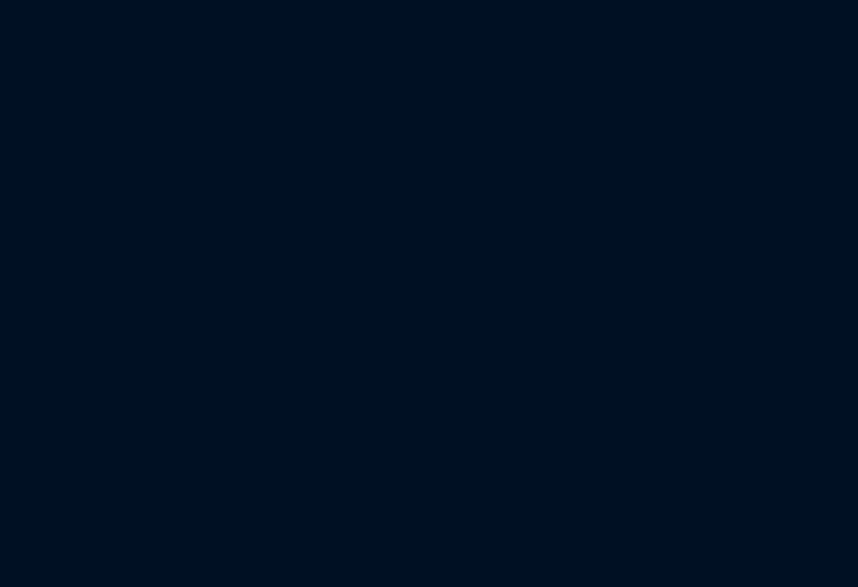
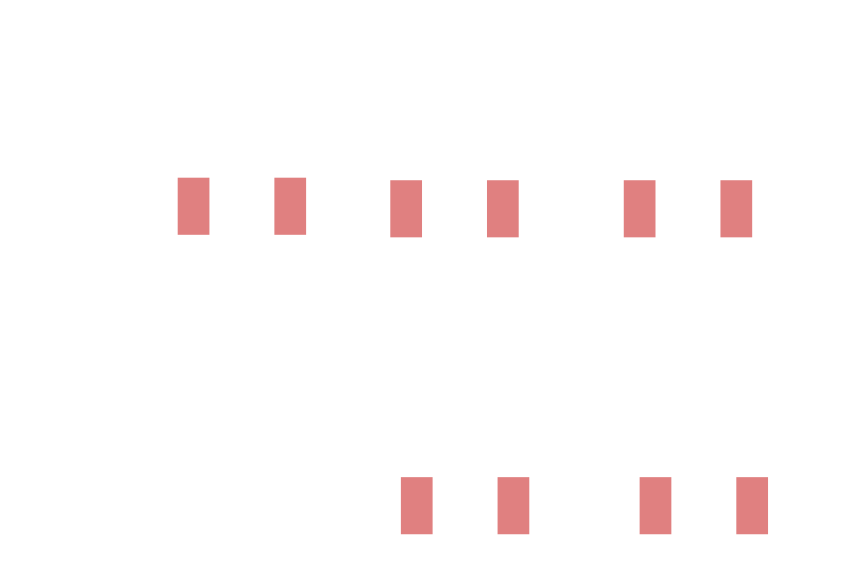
part: none -> (241, 206)
part: none -> (454, 208)
part: none -> (687, 208)
part: none -> (465, 505)
part: none -> (703, 505)

